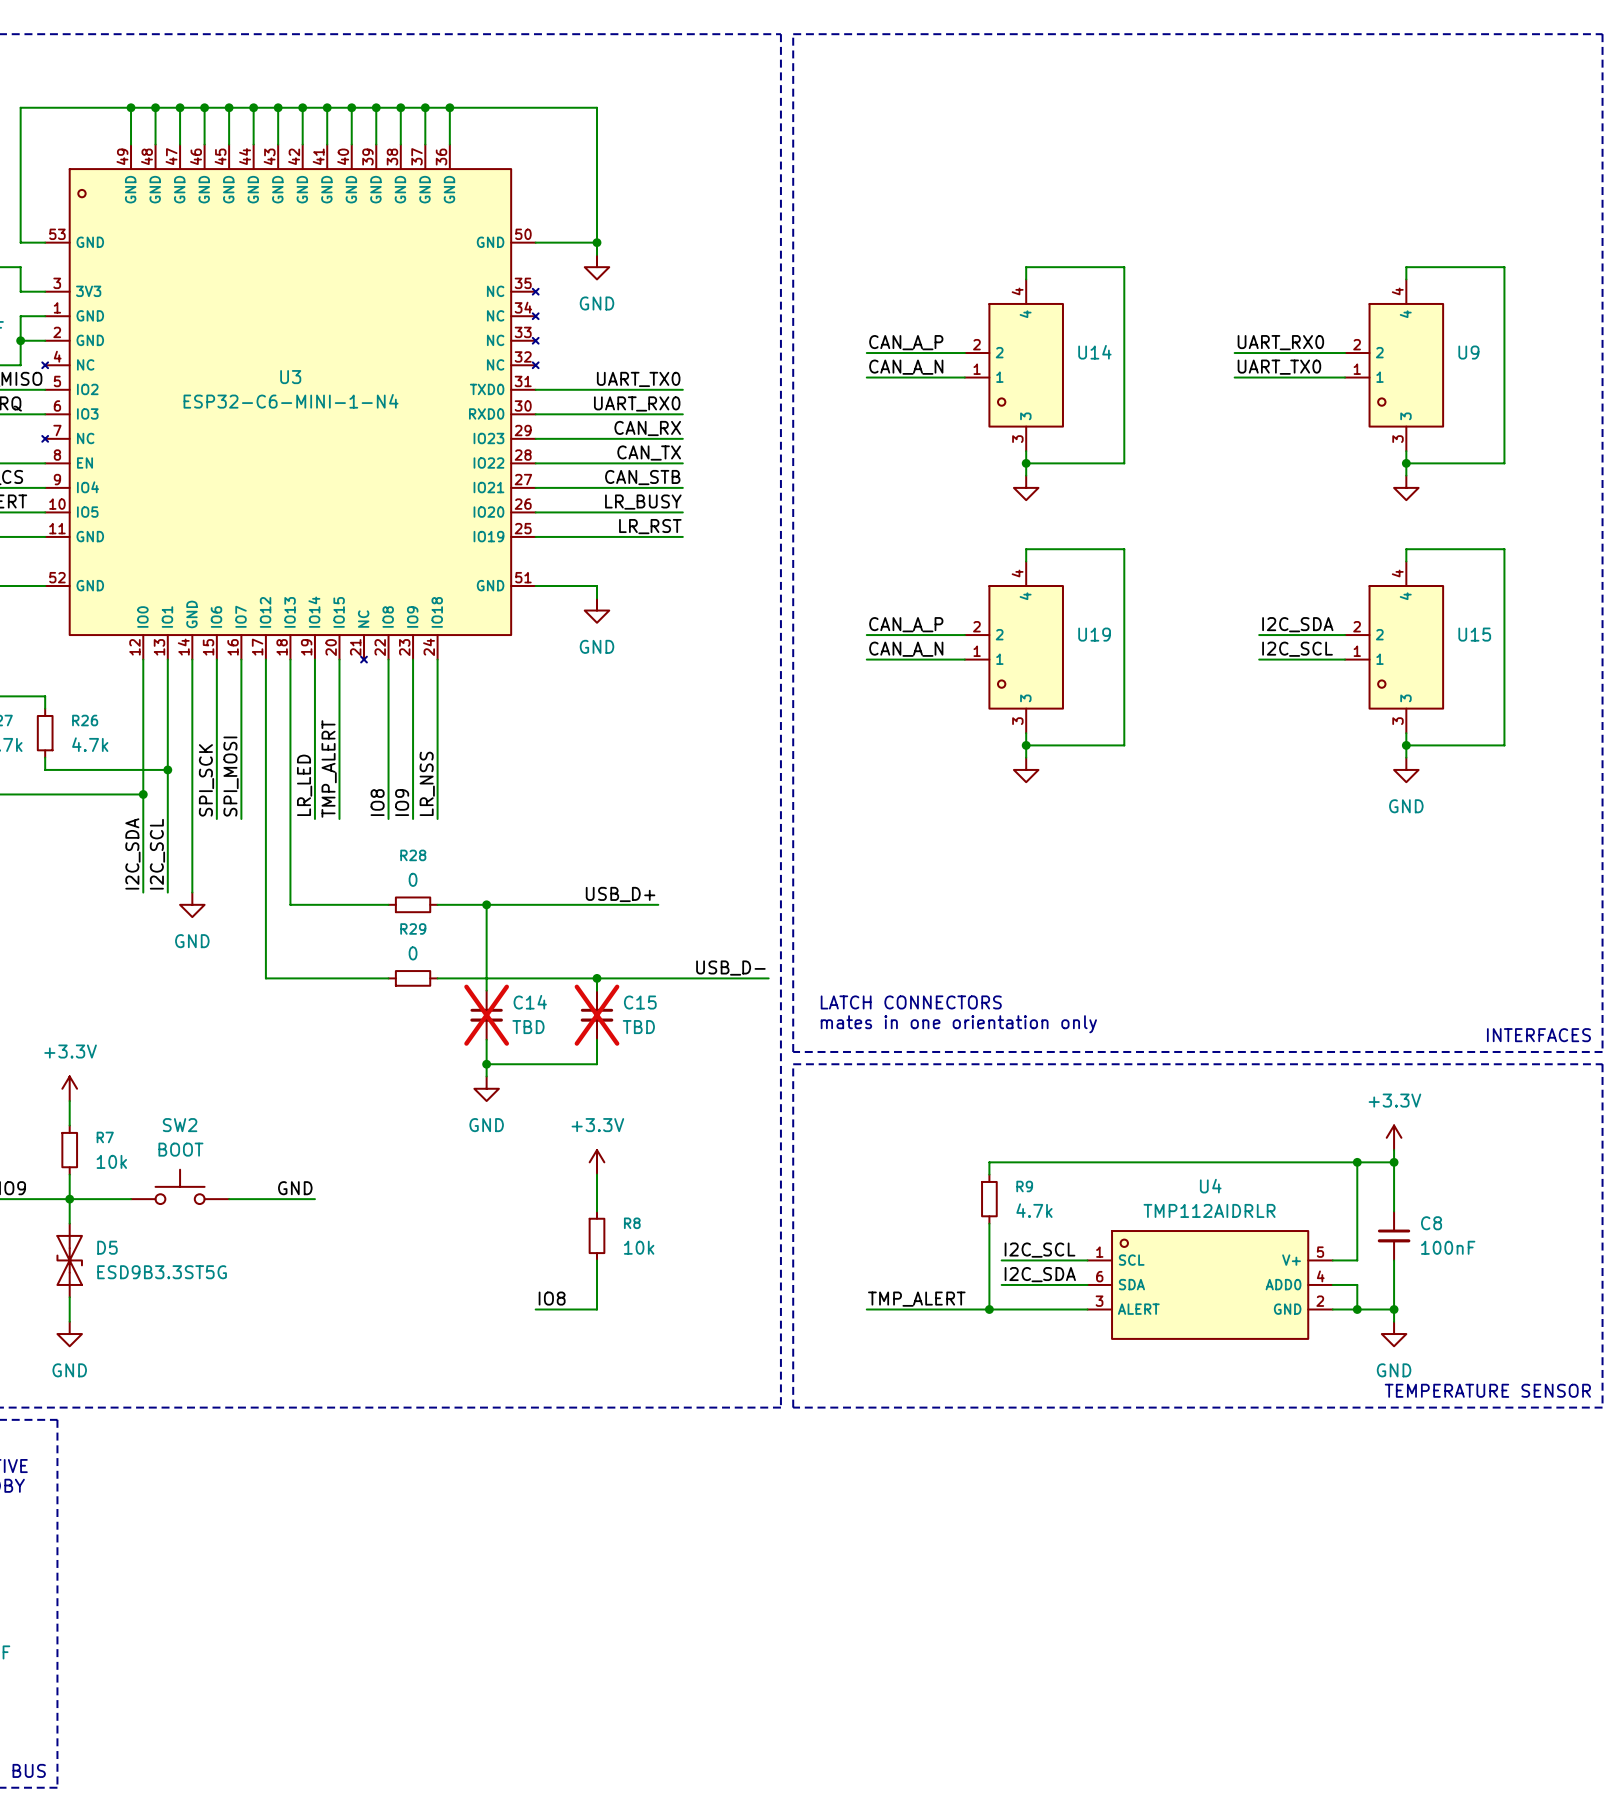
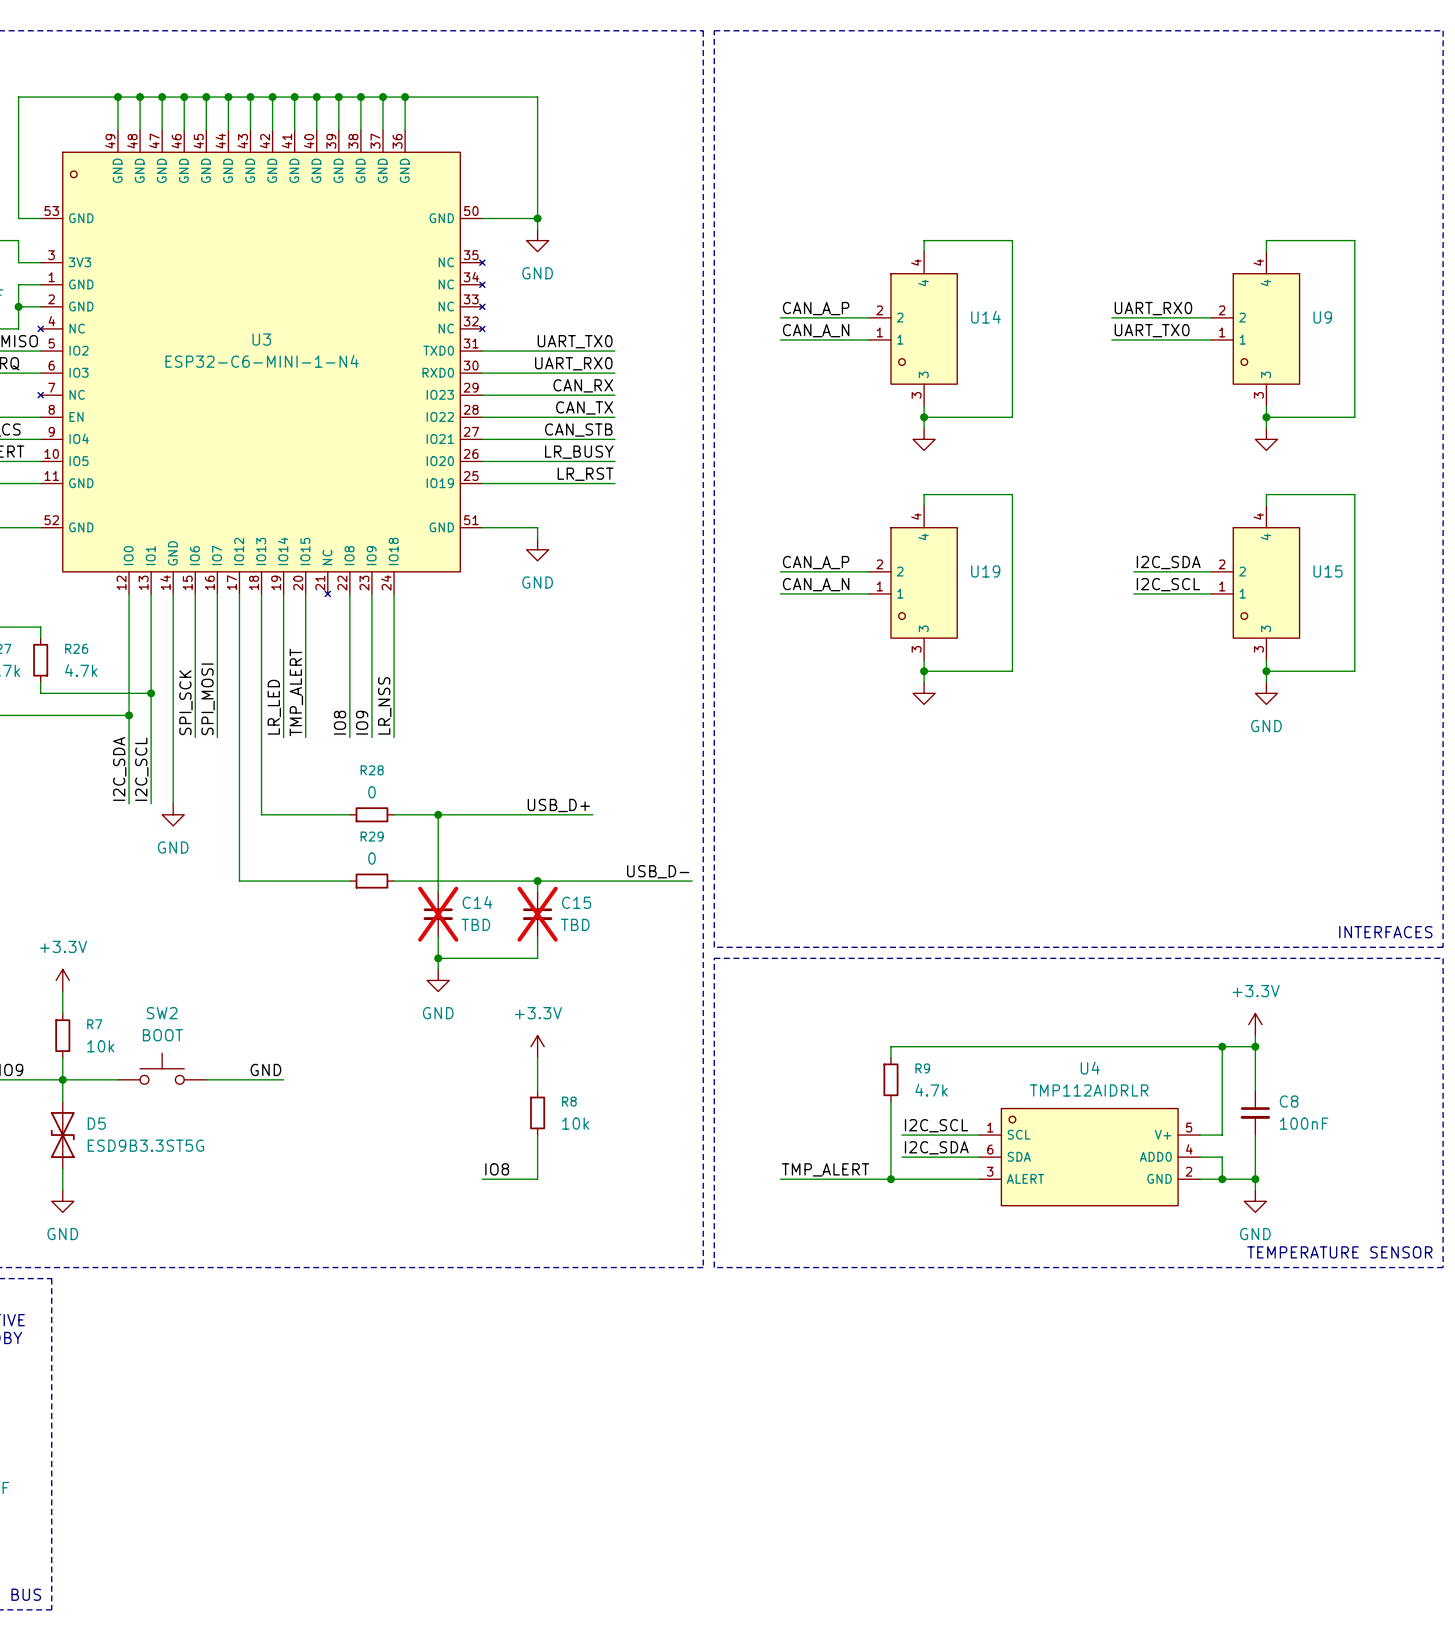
text: LATCH CONNECTORS (911, 1002) -> none
text: mates in one orientation only (958, 1024) -> none

